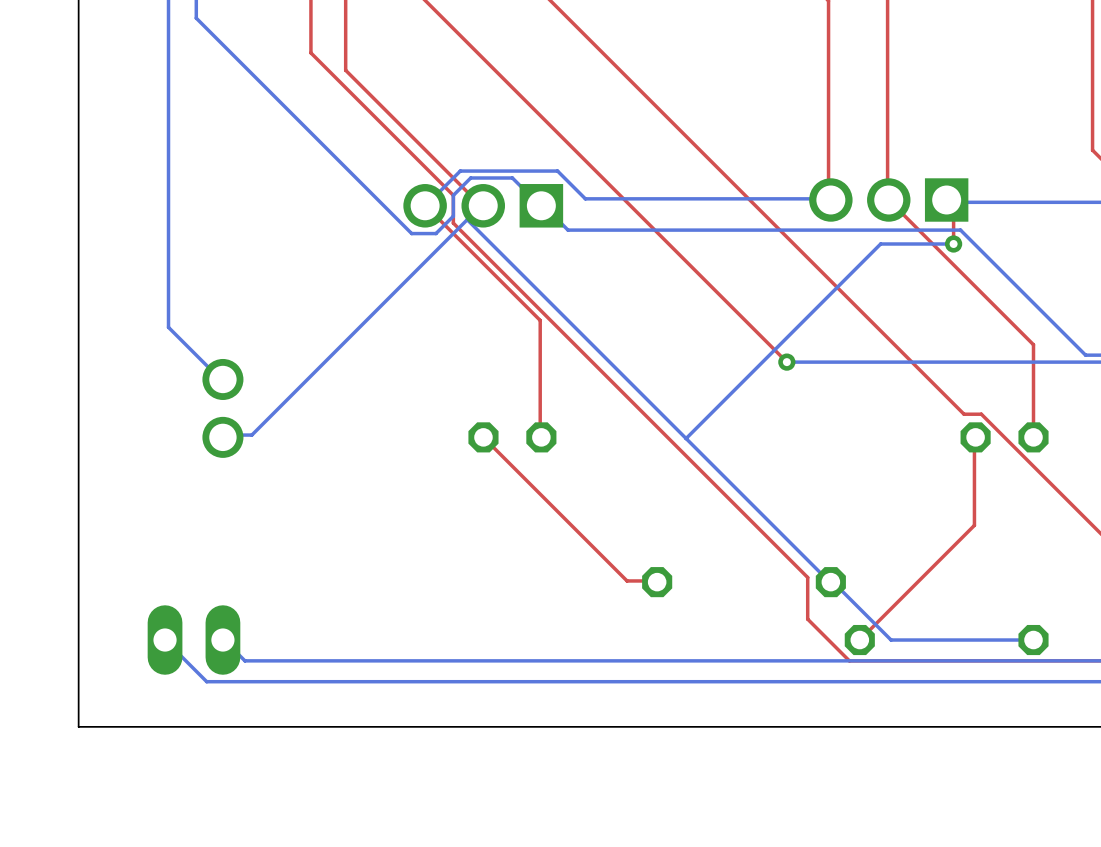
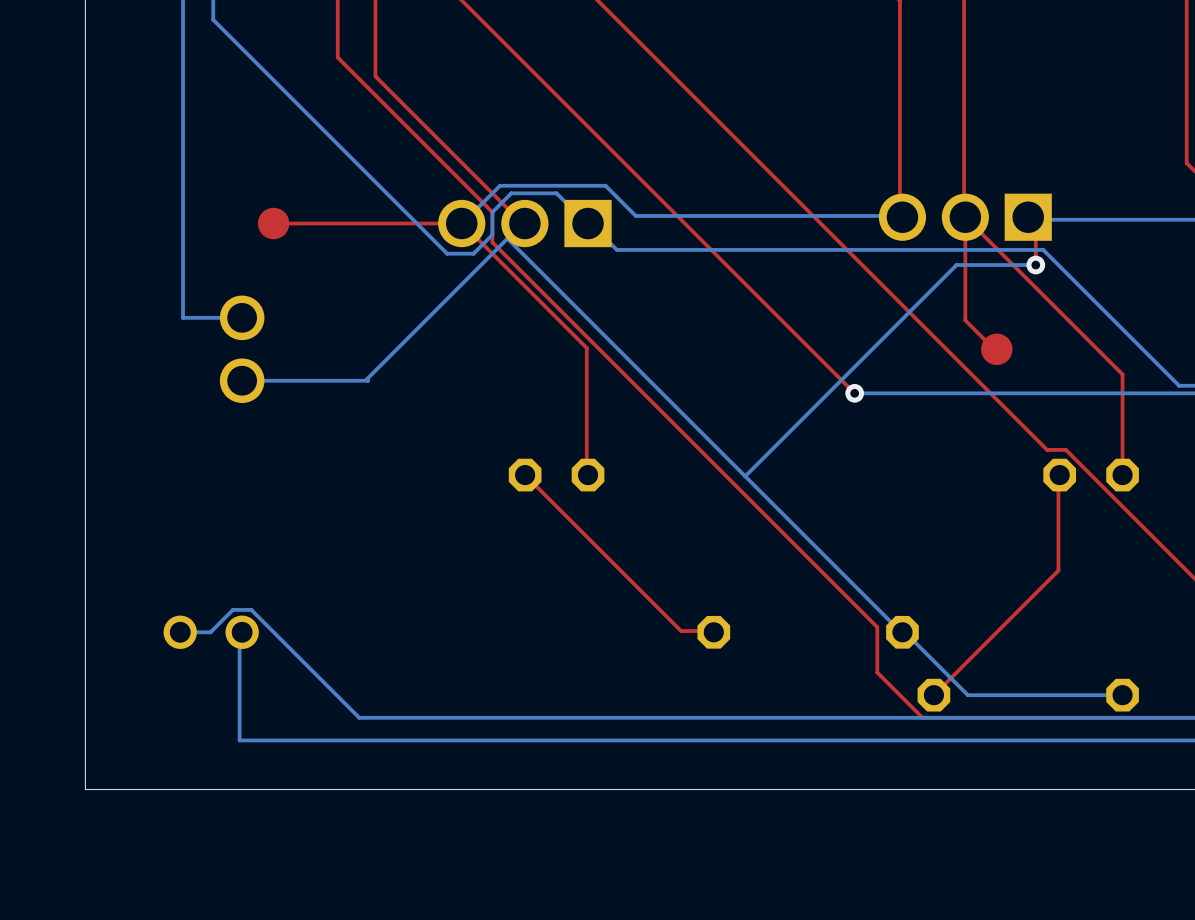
top track: none -> (965, 217) (965, 320) (995, 350) (996, 349)
part: none -> (273, 223)
top track: none -> (461, 223) (273, 223)
bottom track: (168, 292) (168, 327) (220, 379) (222, 379) -> (183, 317) (242, 317)
part: none -> (996, 349)
bottom track: (337, 348) (251, 435) (224, 435) (222, 437) -> (367, 379) (367, 380) (242, 380)
part position: (222, 408) -> (242, 349)
part: none -> (211, 632)
bottom track: (165, 640) (206, 681) (220, 681) -> (242, 632) (239, 634) (239, 740)
part: (193, 640) -> none
bottom track: (222, 640) (244, 660) (330, 660) -> (180, 632) (210, 632) (232, 609) (251, 609) (359, 717)

